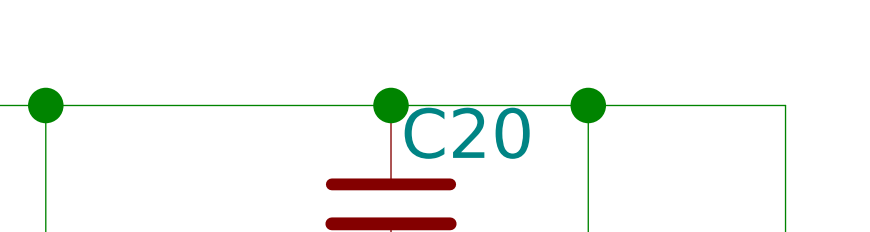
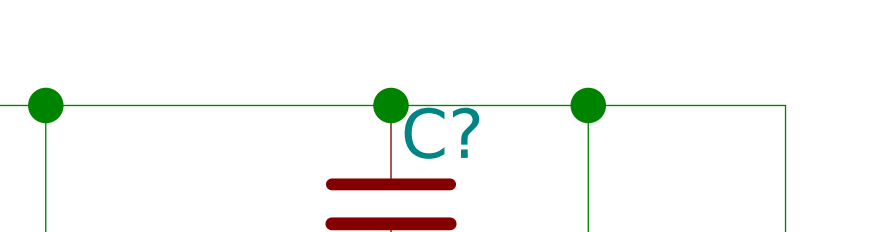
C20 name: C20 (467, 133) -> C? (441, 133)

